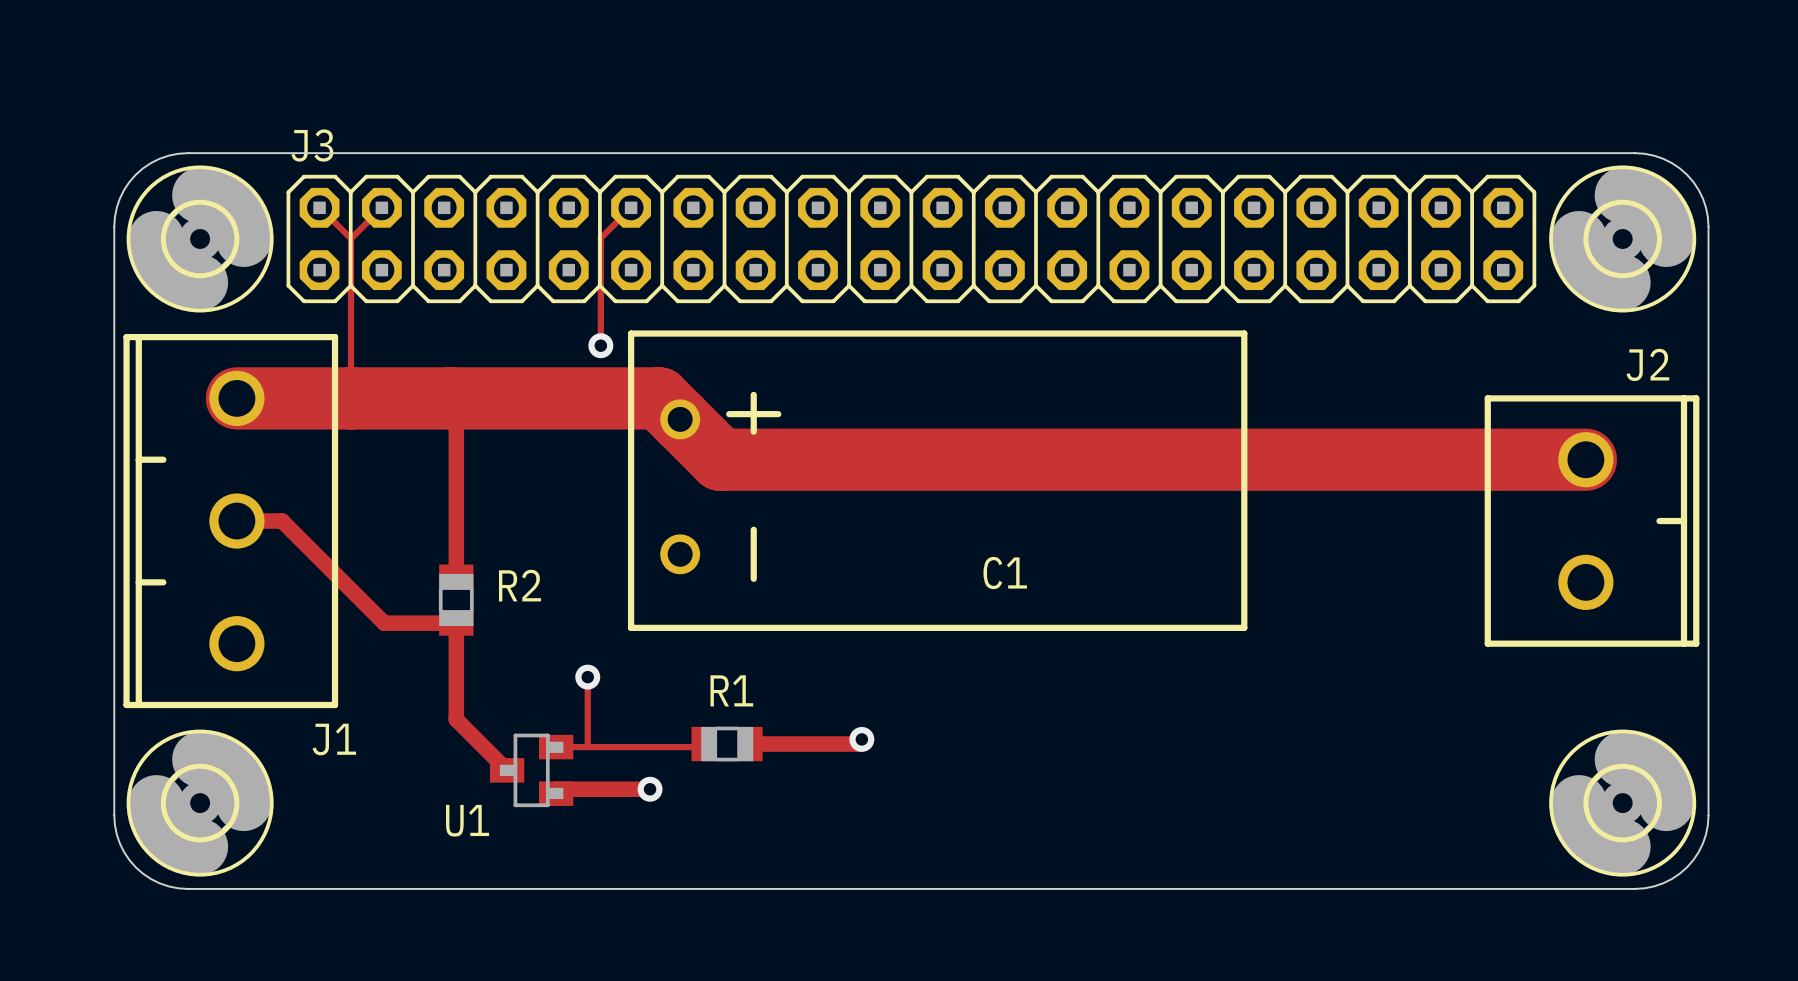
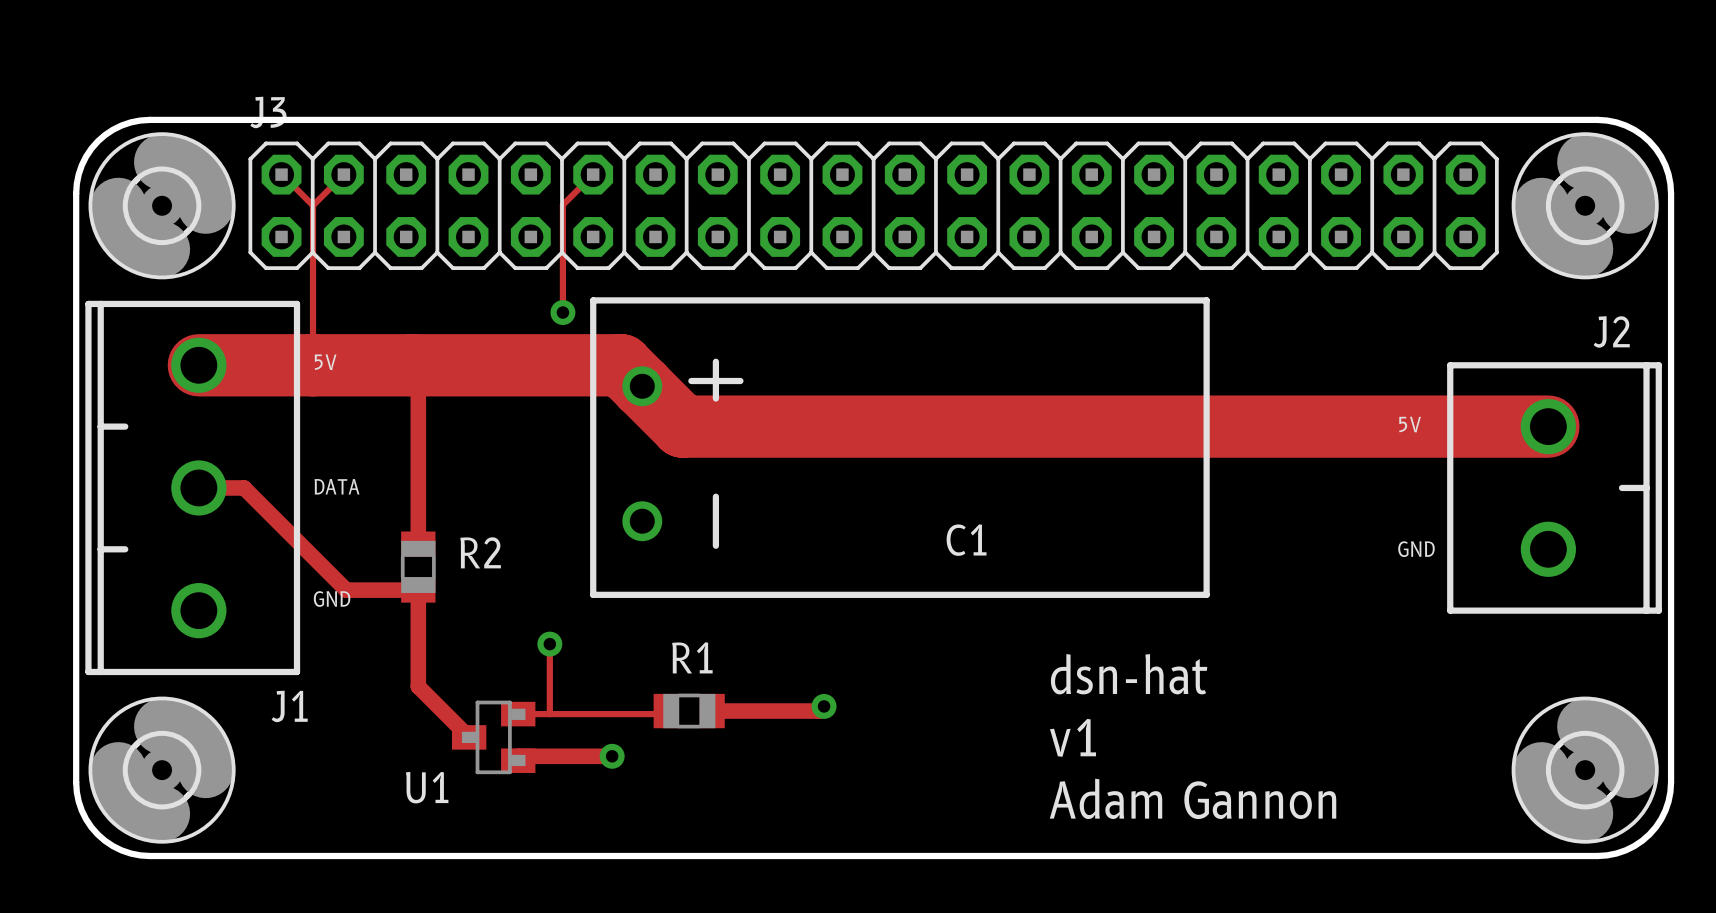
board edge width: thin (187, 153) (1634, 153) (1663, 158) (1679, 168) (1693, 181) (1706, 207) (1708, 226) (1708, 815) (1702, 843) (1693, 860) (1679, 873) (1653, 886) (1634, 888) (187, 888) (159, 883) (143, 873) (129, 860) (119, 843) (114, 824) (114, 226) (119, 198) (135, 174) (159, 158) (187, 153) -> thick (149, 119) (1597, 119) (1625, 125) (1642, 135) (1655, 148) (1668, 174) (1671, 193) (1671, 782) (1665, 810) (1655, 827) (1642, 840) (1616, 853) (1597, 856) (149, 856) (121, 850) (104, 840) (91, 827) (81, 810) (76, 792) (76, 193) (81, 165) (97, 141) (121, 125) (149, 119)
text: none -> 5V (325, 362)
text: none -> 5V (1410, 424)
text: none -> DATA (337, 486)
text: none -> GND (1416, 549)
text: none -> GND (332, 599)
text: none -> dsn-hat (1129, 674)
text: none -> v1 (1073, 737)
text: none -> Adam Gannon (1193, 798)

